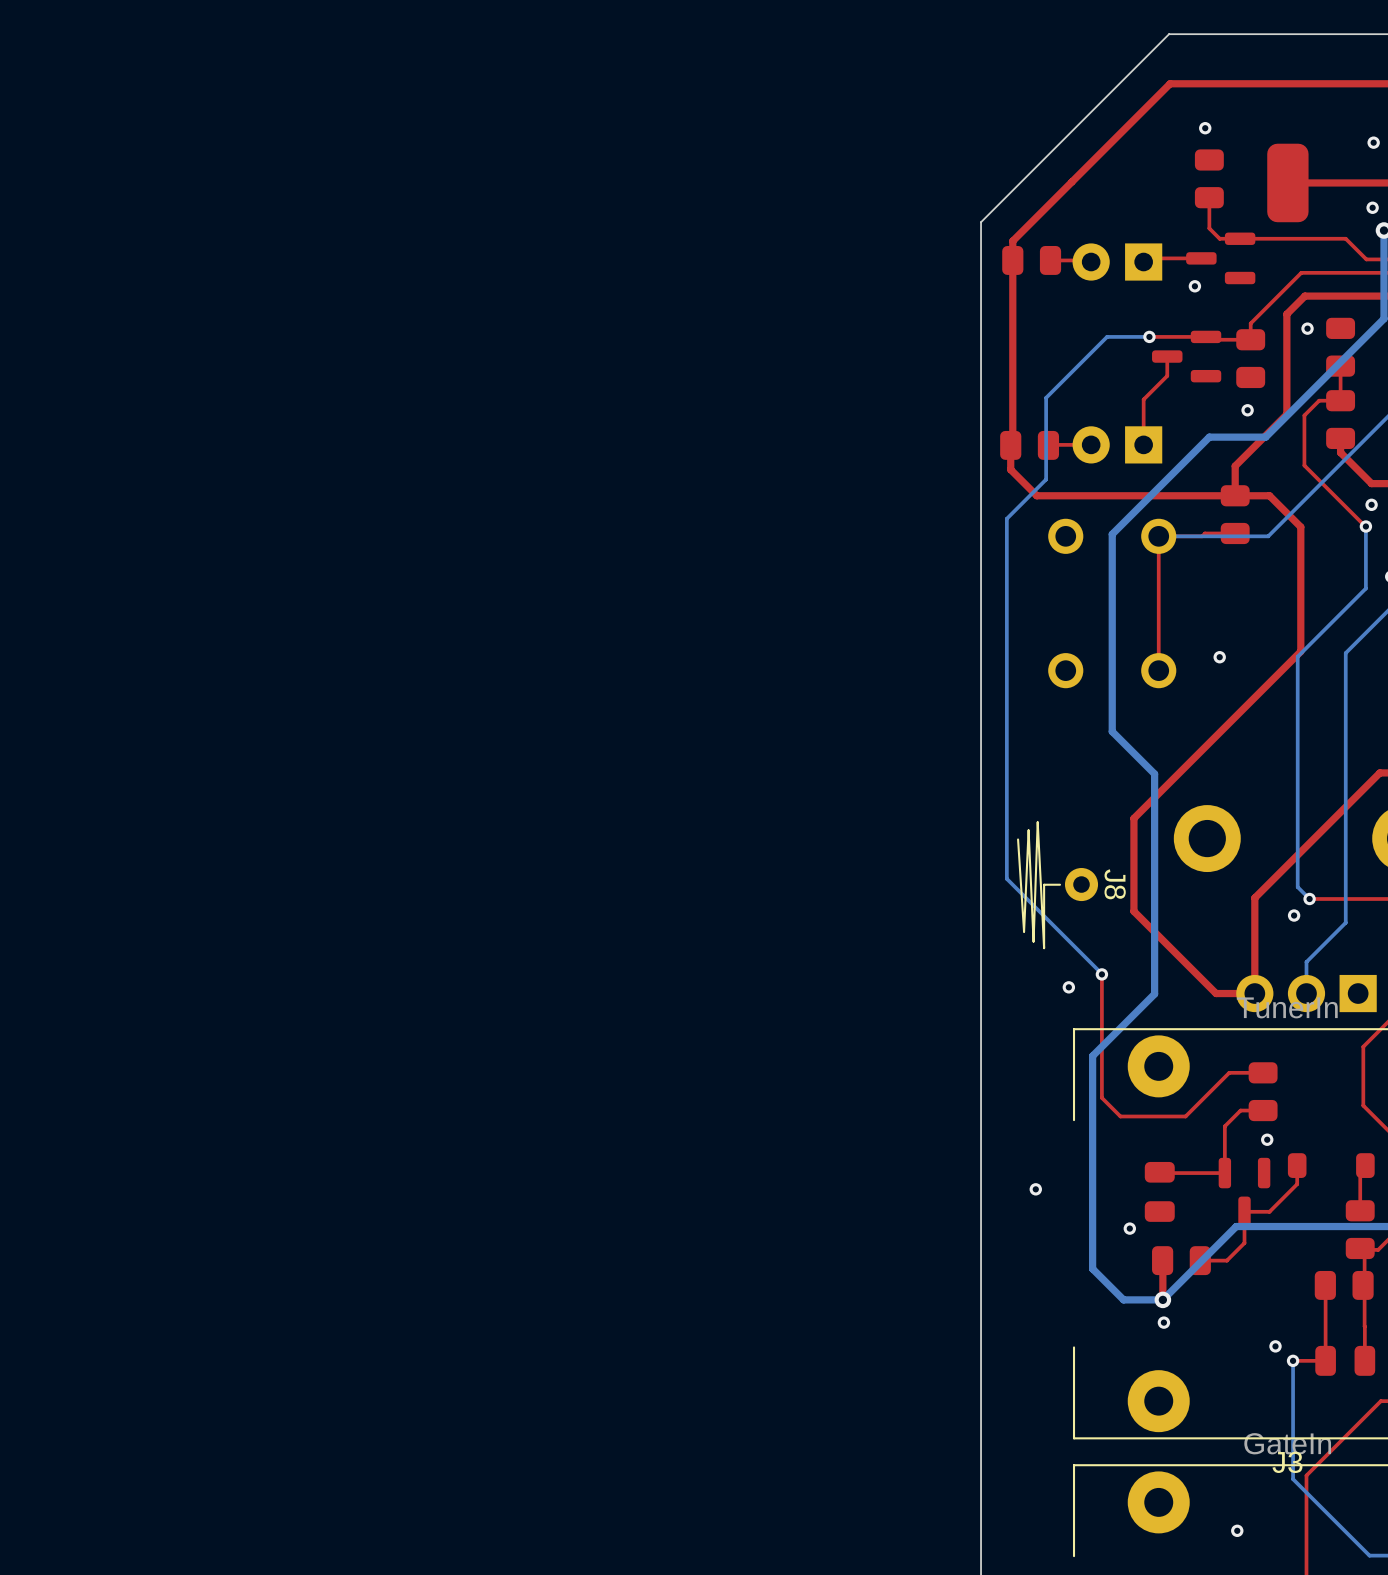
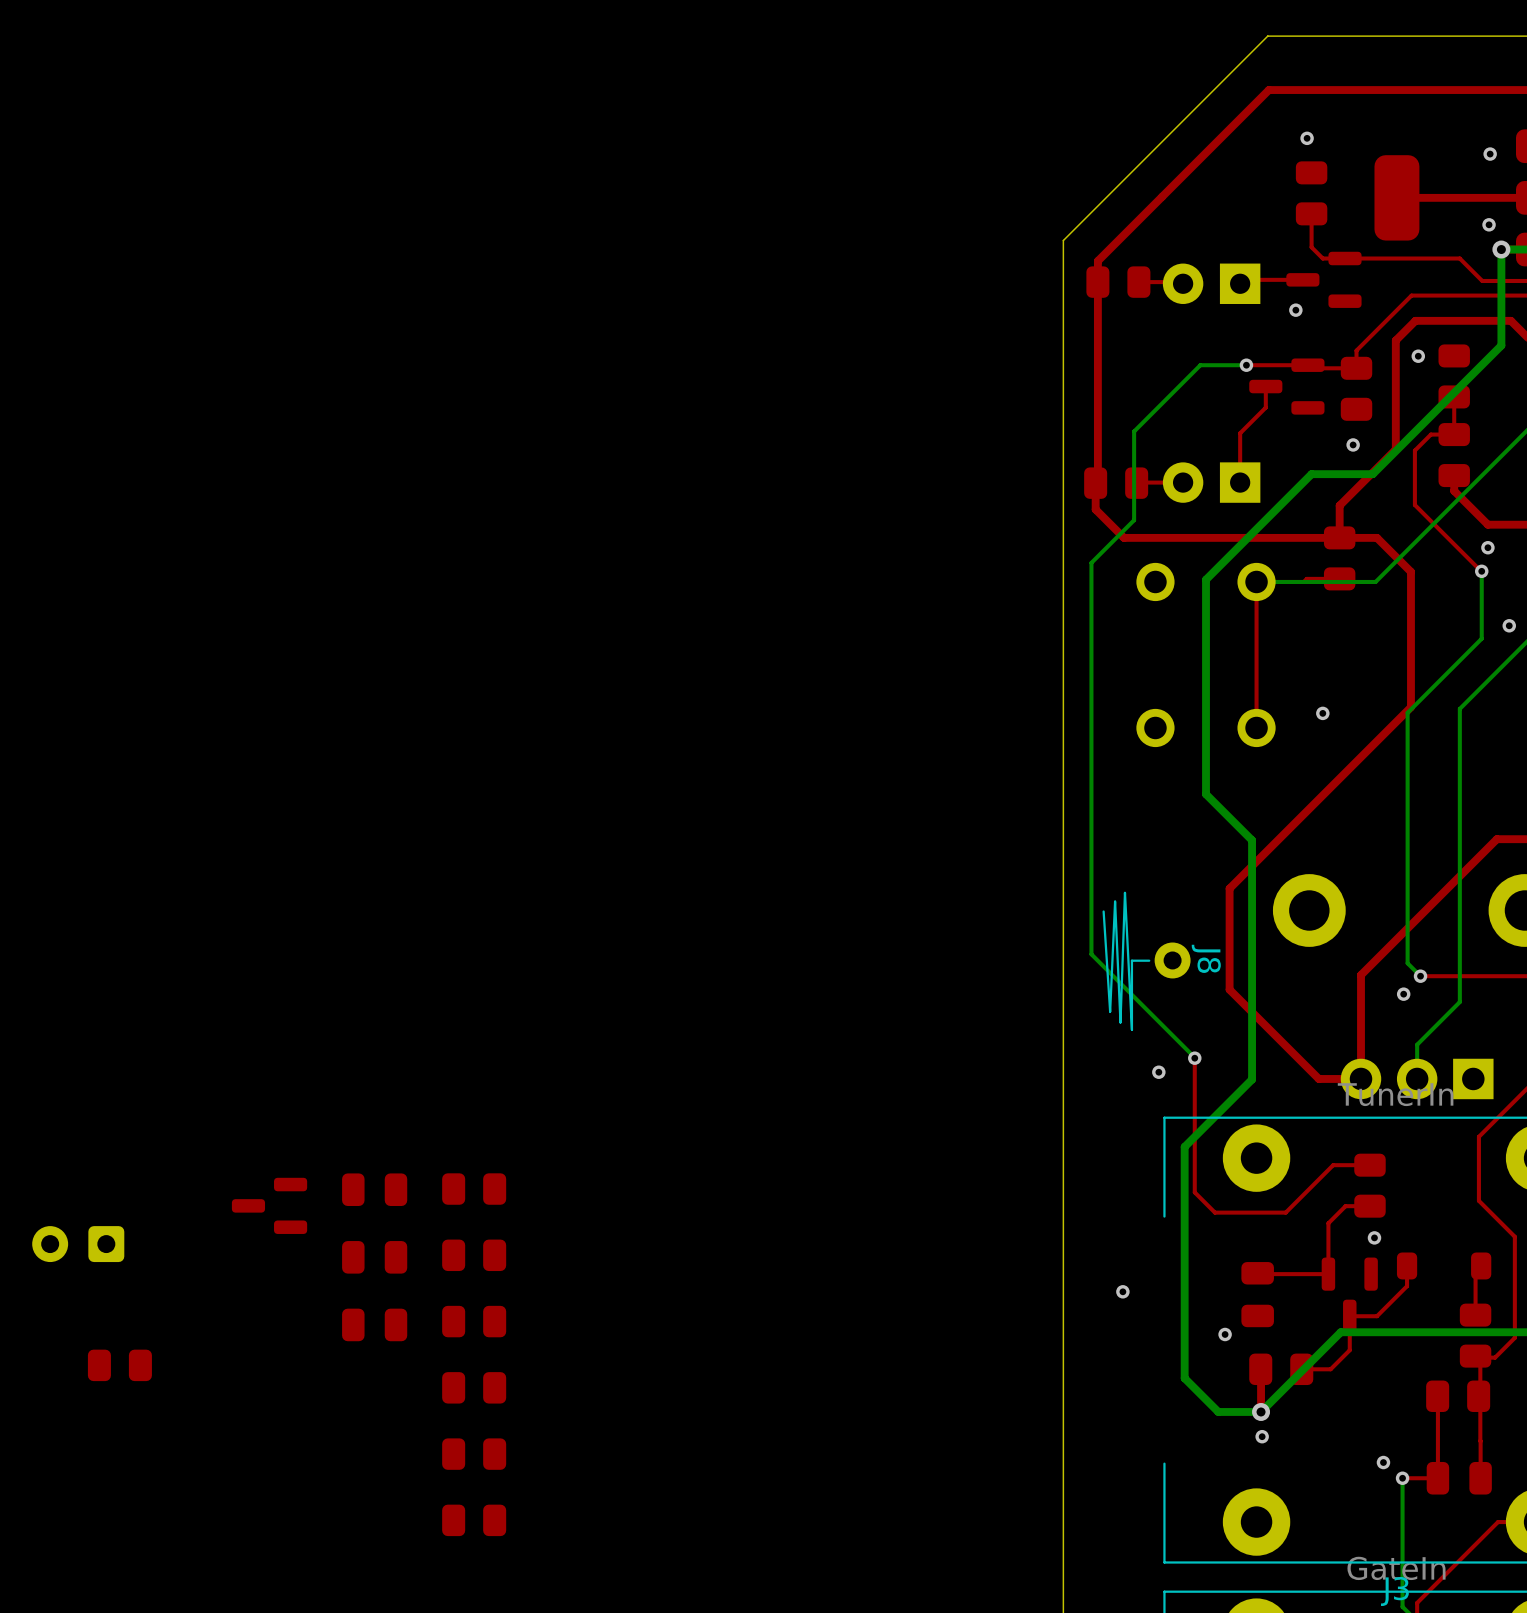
part: none -> (474, 1189)
part: none -> (374, 1189)
part: none -> (269, 1205)
part: none -> (78, 1244)
part: none -> (474, 1255)
part: none -> (374, 1257)
part: none -> (474, 1321)
part: none -> (374, 1324)
part: none -> (119, 1365)
part: none -> (474, 1387)
part: none -> (474, 1454)
part: none -> (474, 1520)

